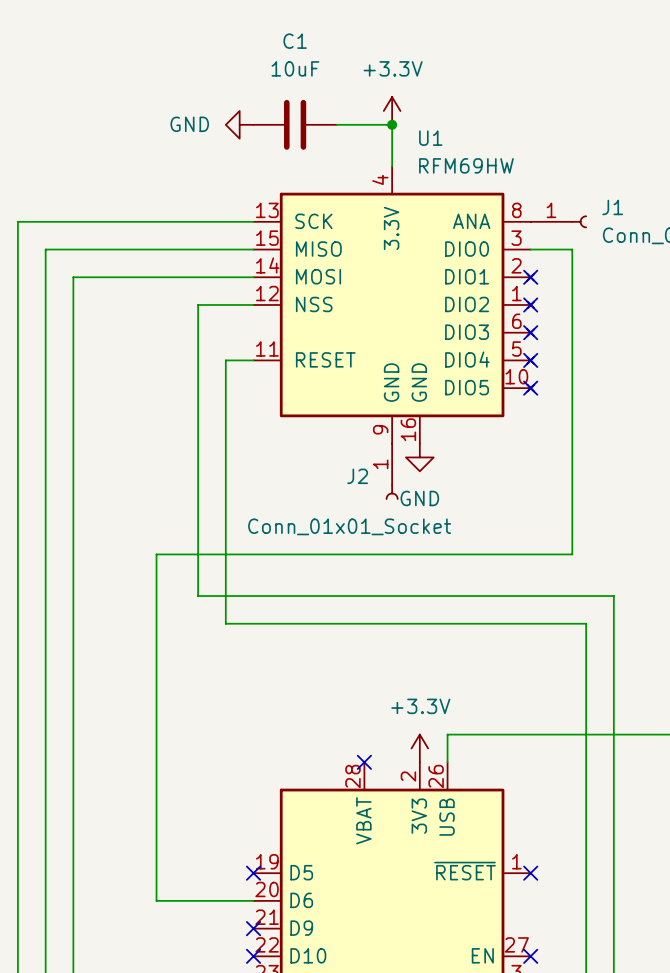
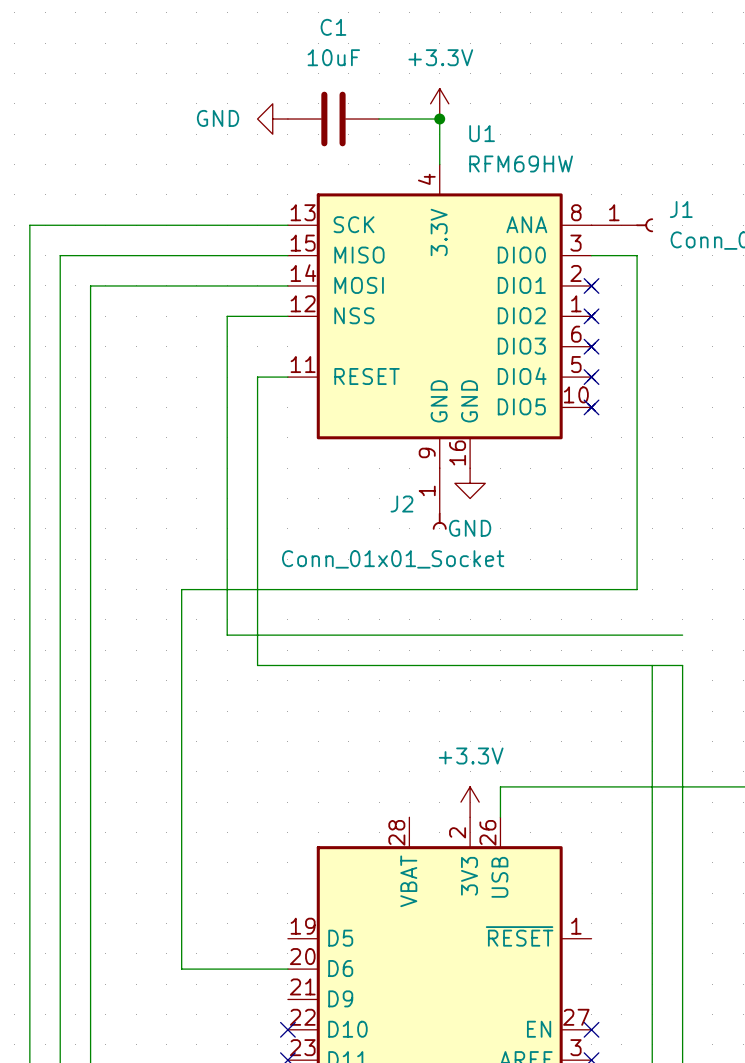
wire: (613, 596) (613, 623) -> (652, 665) (682, 665)
no-connect mark: (364, 762) -> none
no-connect mark: (253, 873) -> none
no-connect mark: (530, 873) -> none
no-connect mark: (253, 928) -> none

